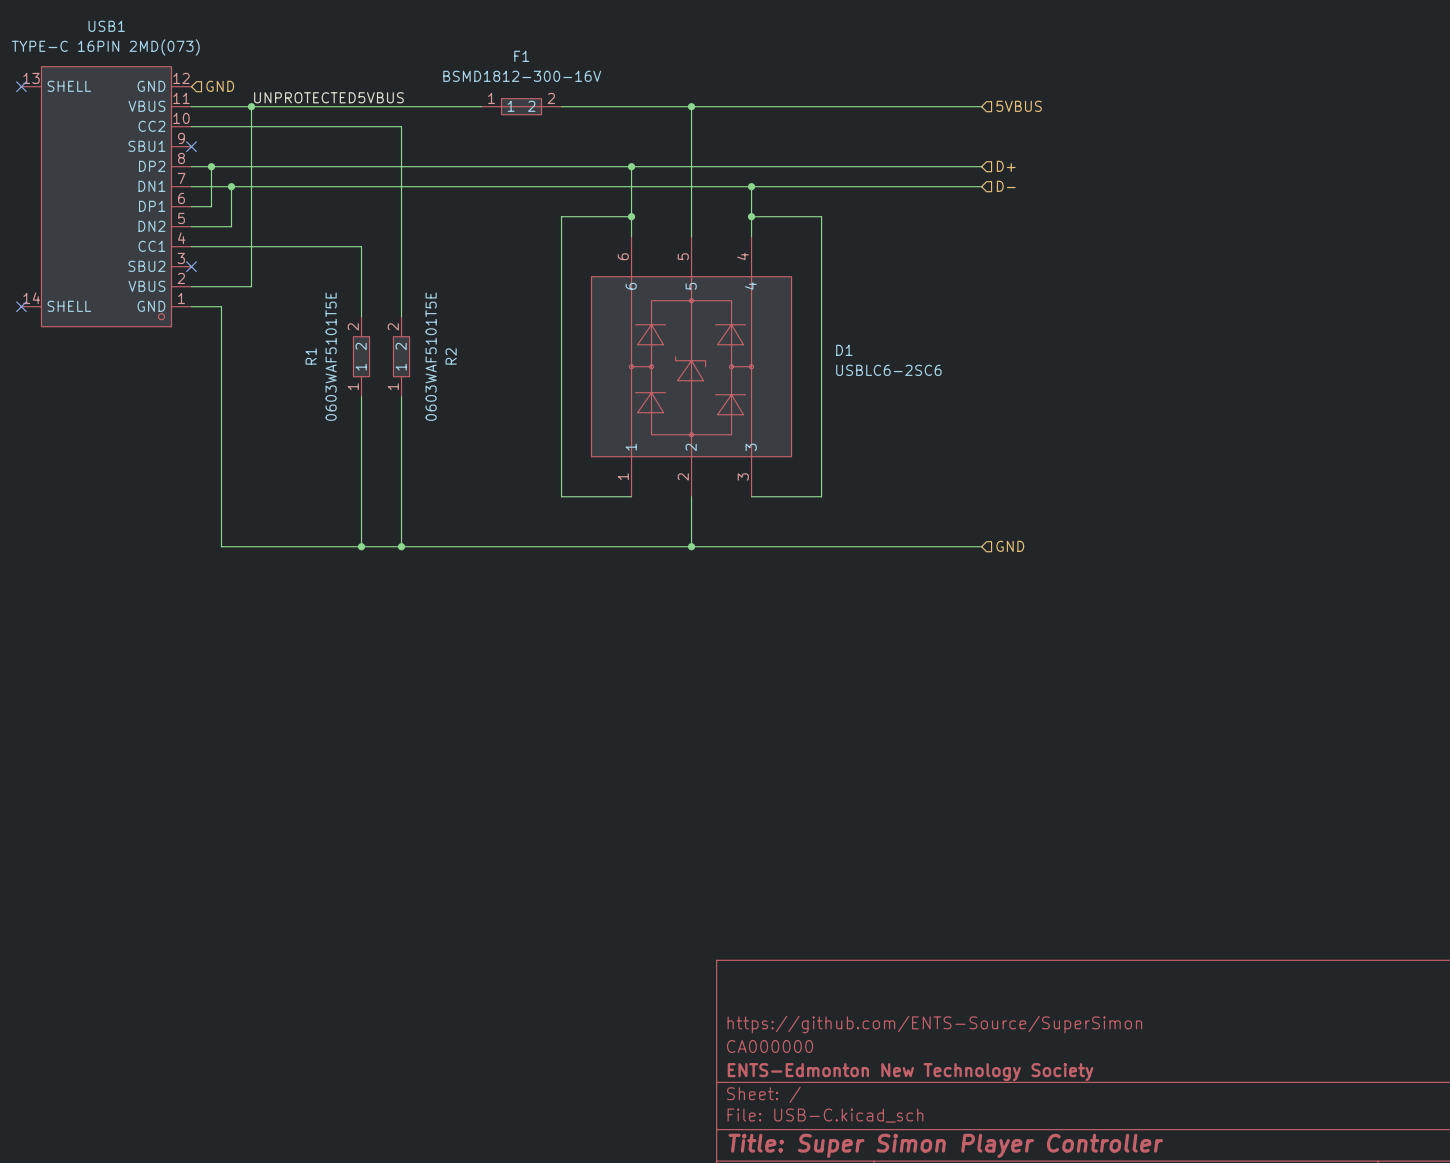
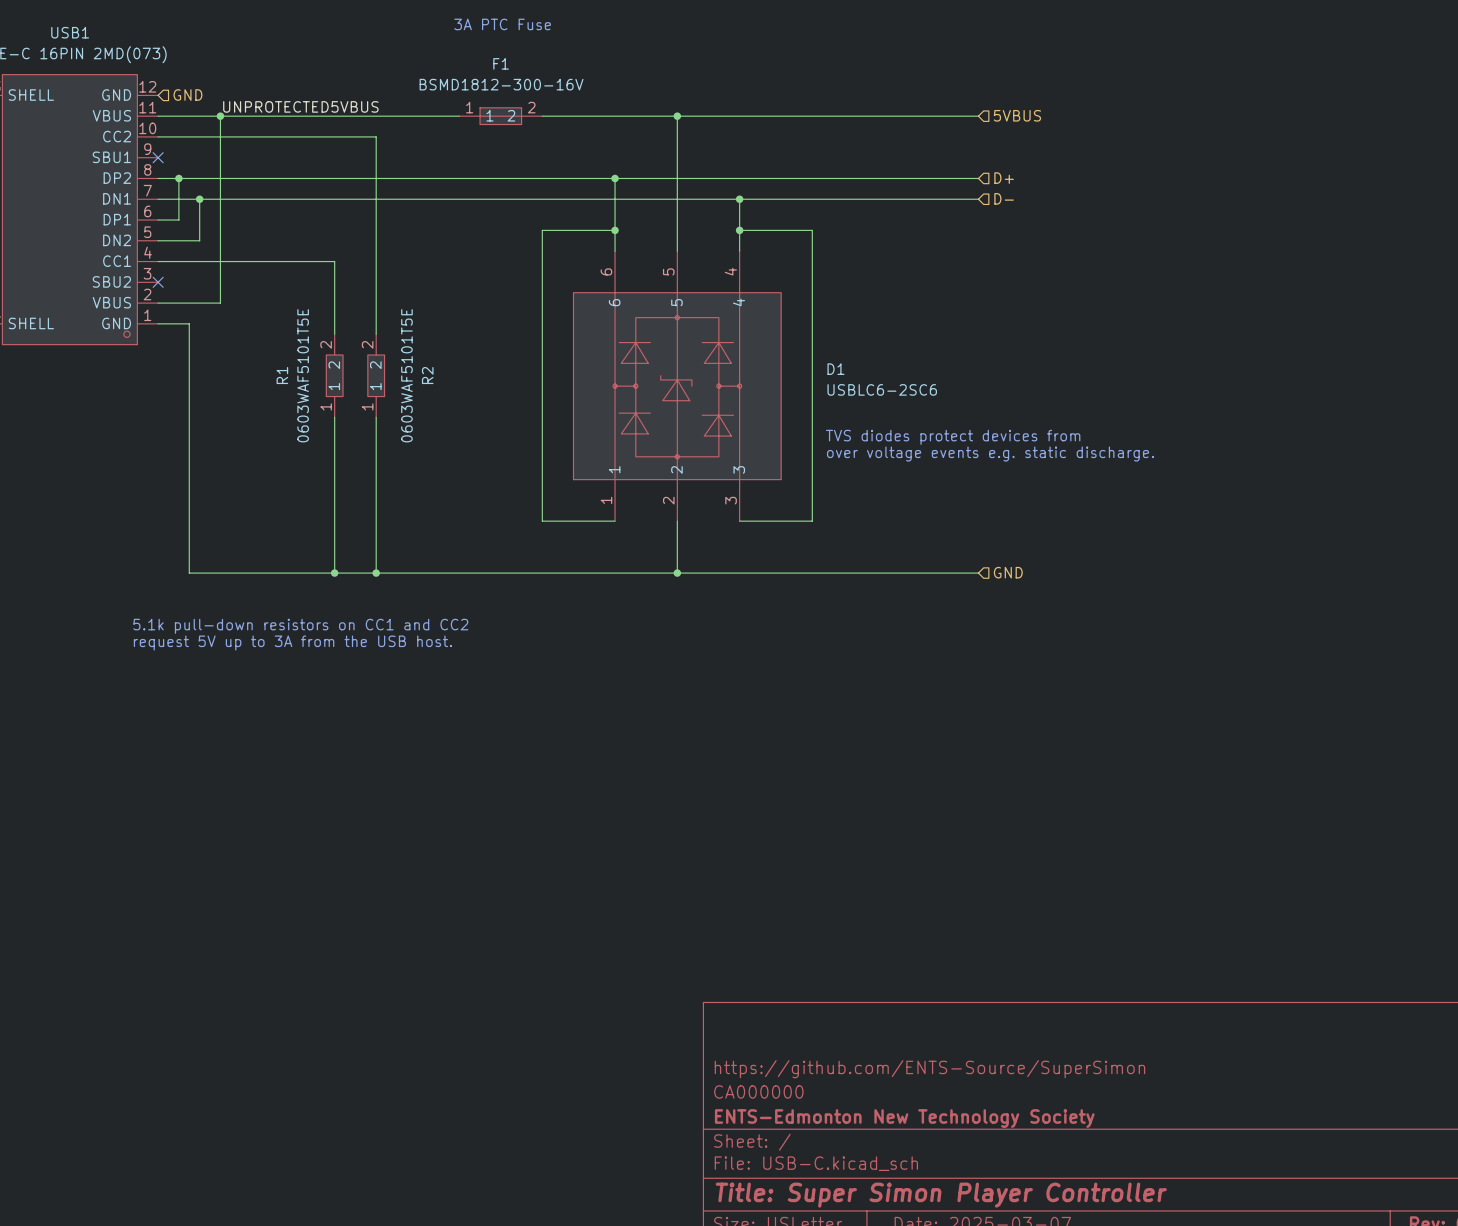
text: none -> 3A PTC Fuse (502, 24)
text: none -> TVS diodes protect devices from (953, 437)
text: none -> over voltage events e.g. static discharge. (990, 454)
text: none -> 5.1k pull-down resistors on CC1 and CC2 (300, 626)
text: none -> request 5V up to 3A from the USB host. (292, 643)

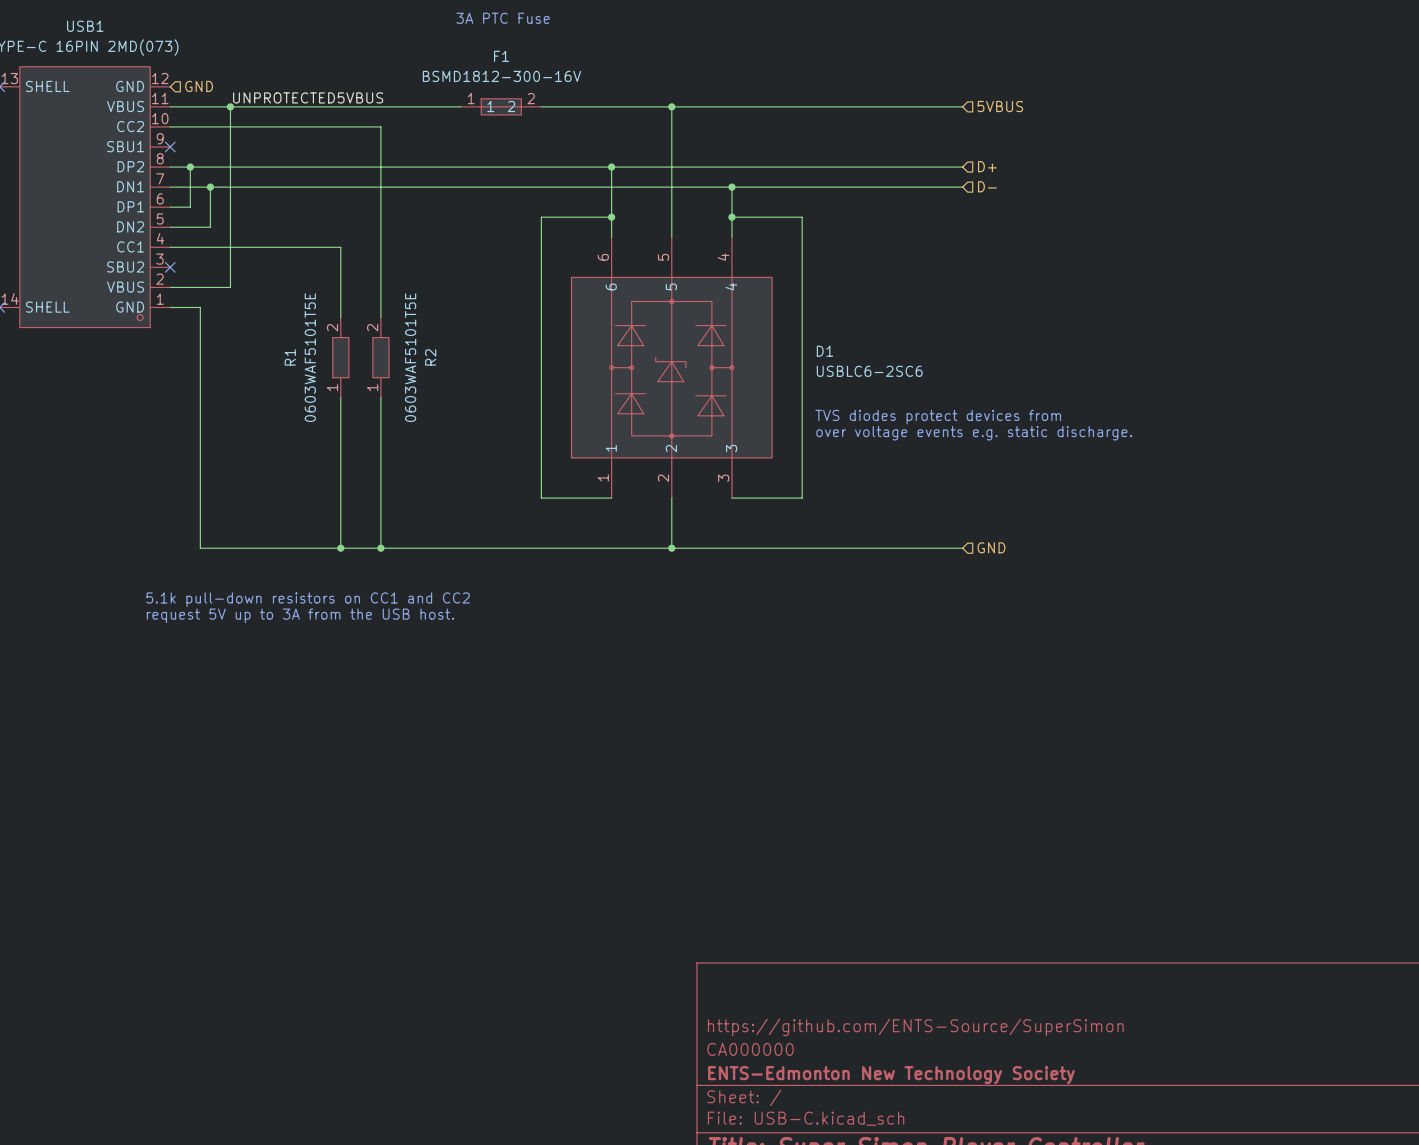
R1 pin name: 2 (334, 365) -> none
R2 pin name: 2 (375, 365) -> none
R1 pin name: 1 (334, 386) -> none
R2 pin name: 1 (375, 386) -> none

